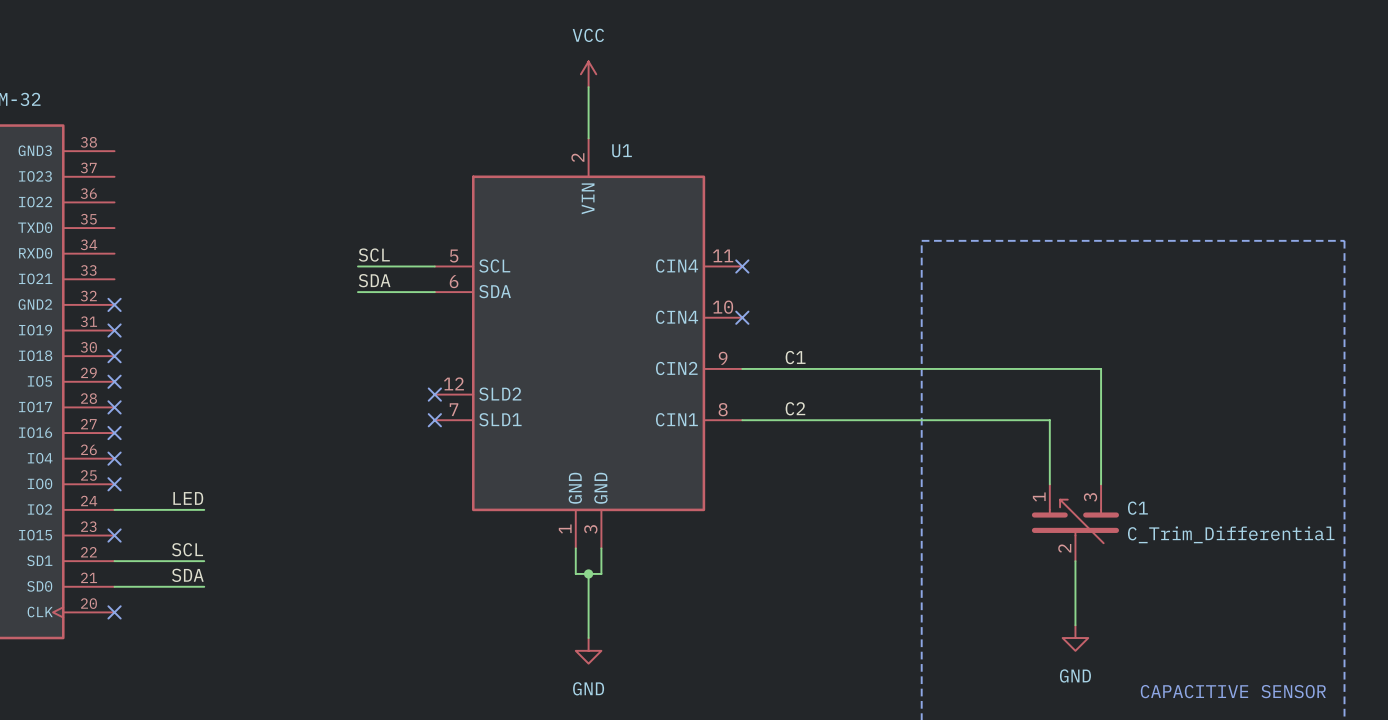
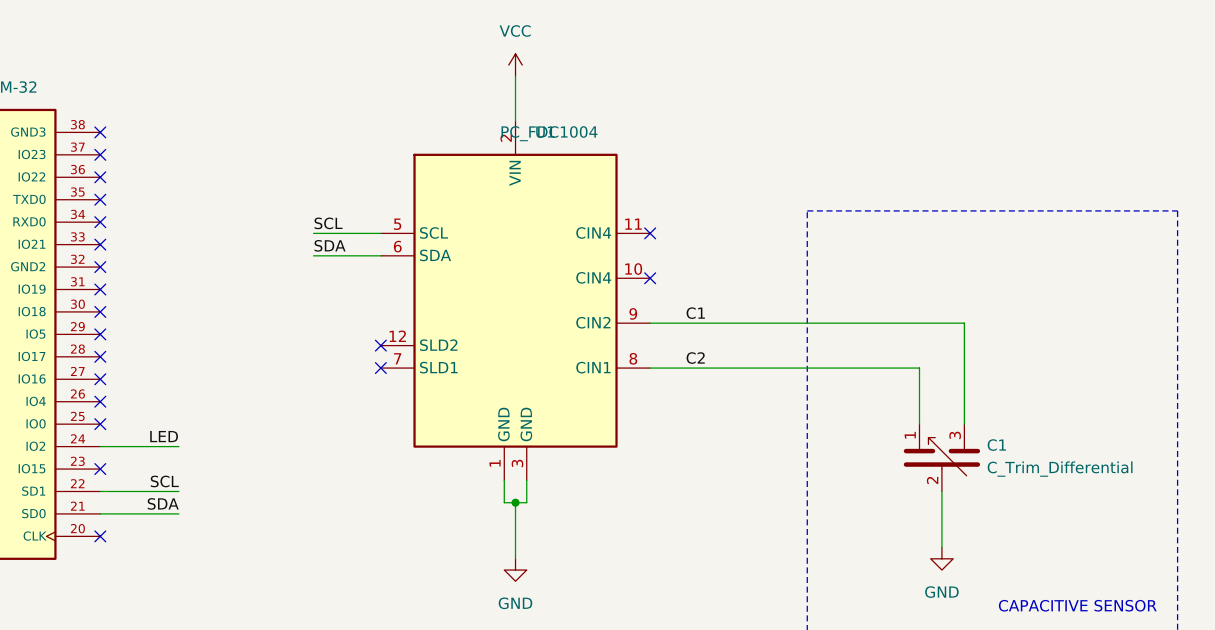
no-connect mark: none -> (100, 132)
U1 value: none -> PC_FDC1004 (549, 133)
no-connect mark: none -> (100, 154)
no-connect mark: none -> (100, 177)
no-connect mark: none -> (100, 199)
no-connect mark: none -> (100, 222)
no-connect mark: none -> (100, 244)

